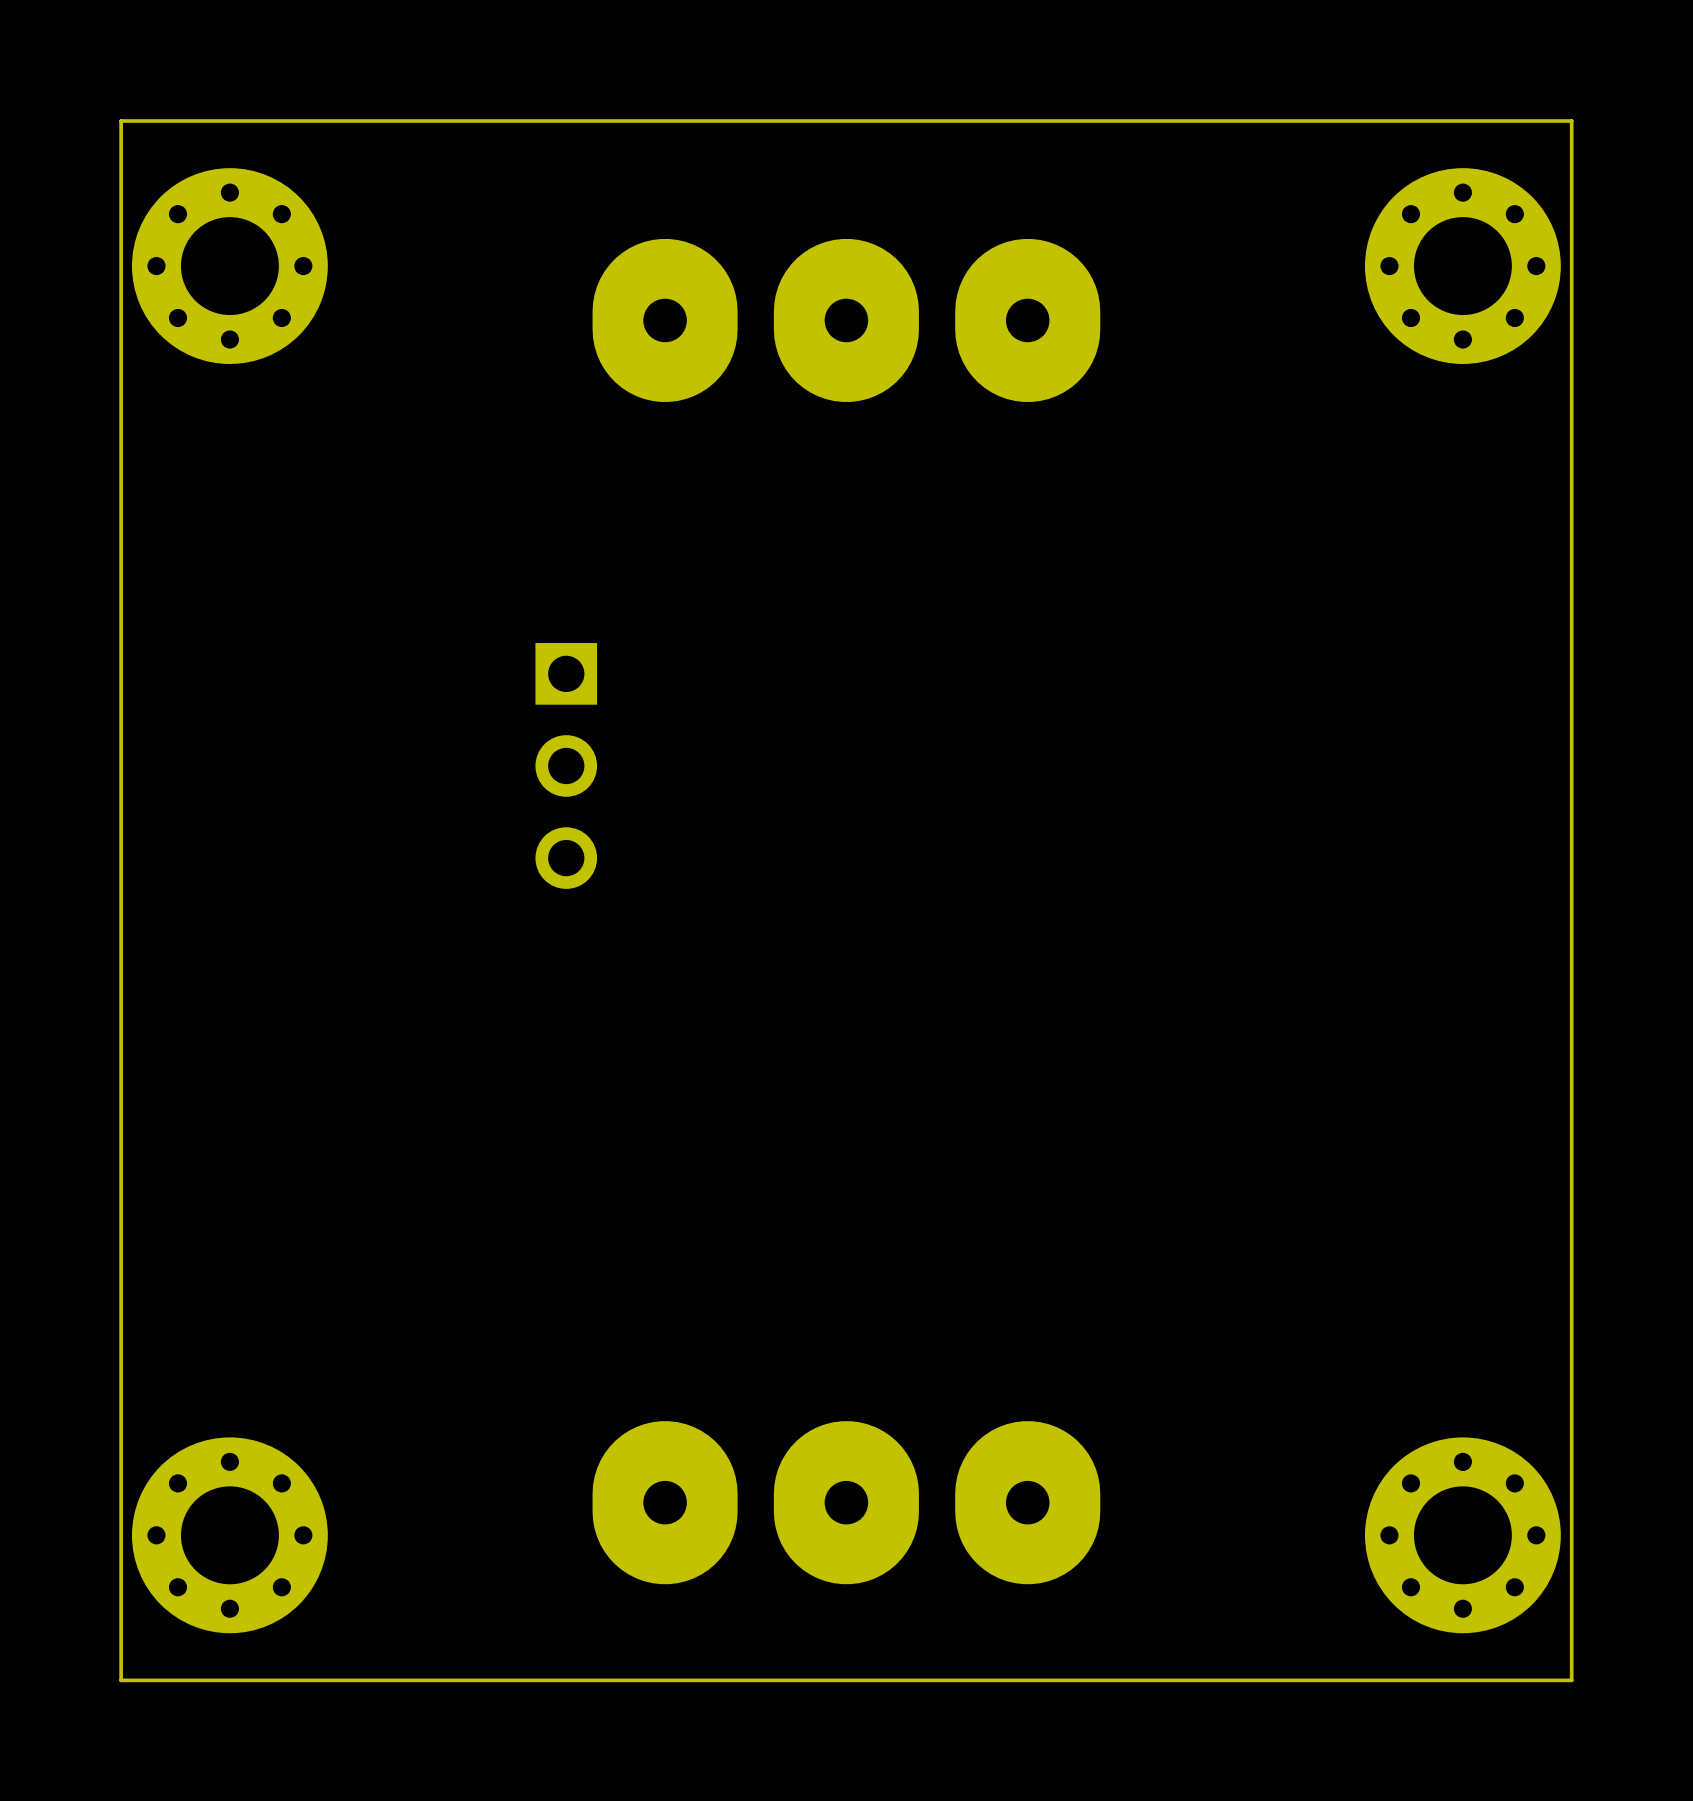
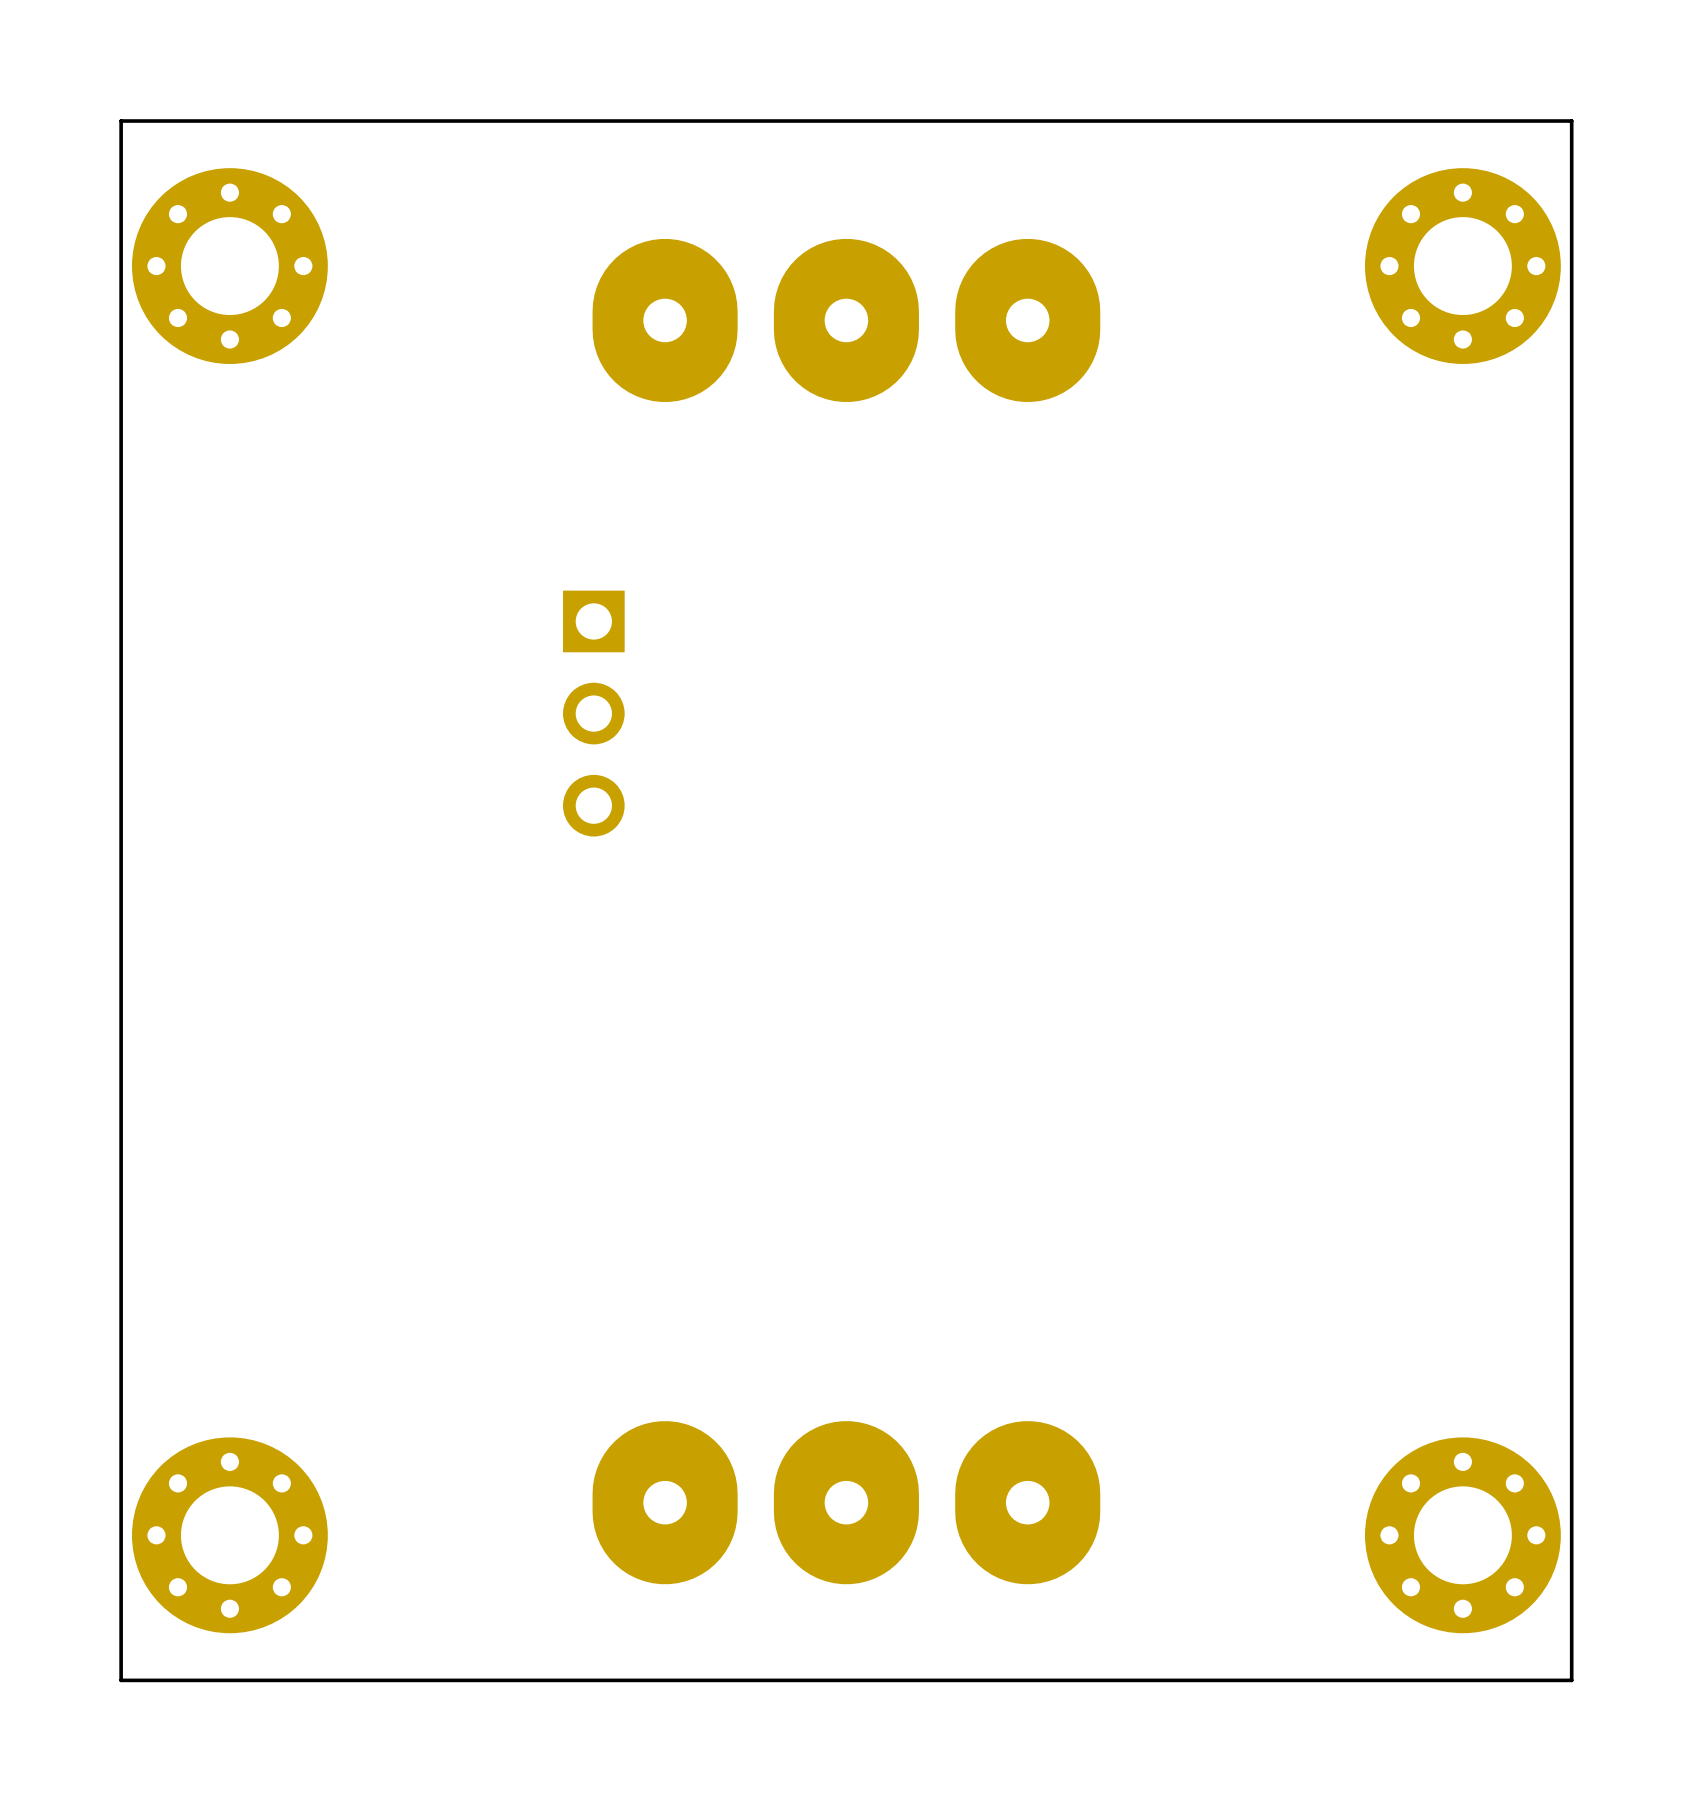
part position: (566, 765) -> (593, 713)

